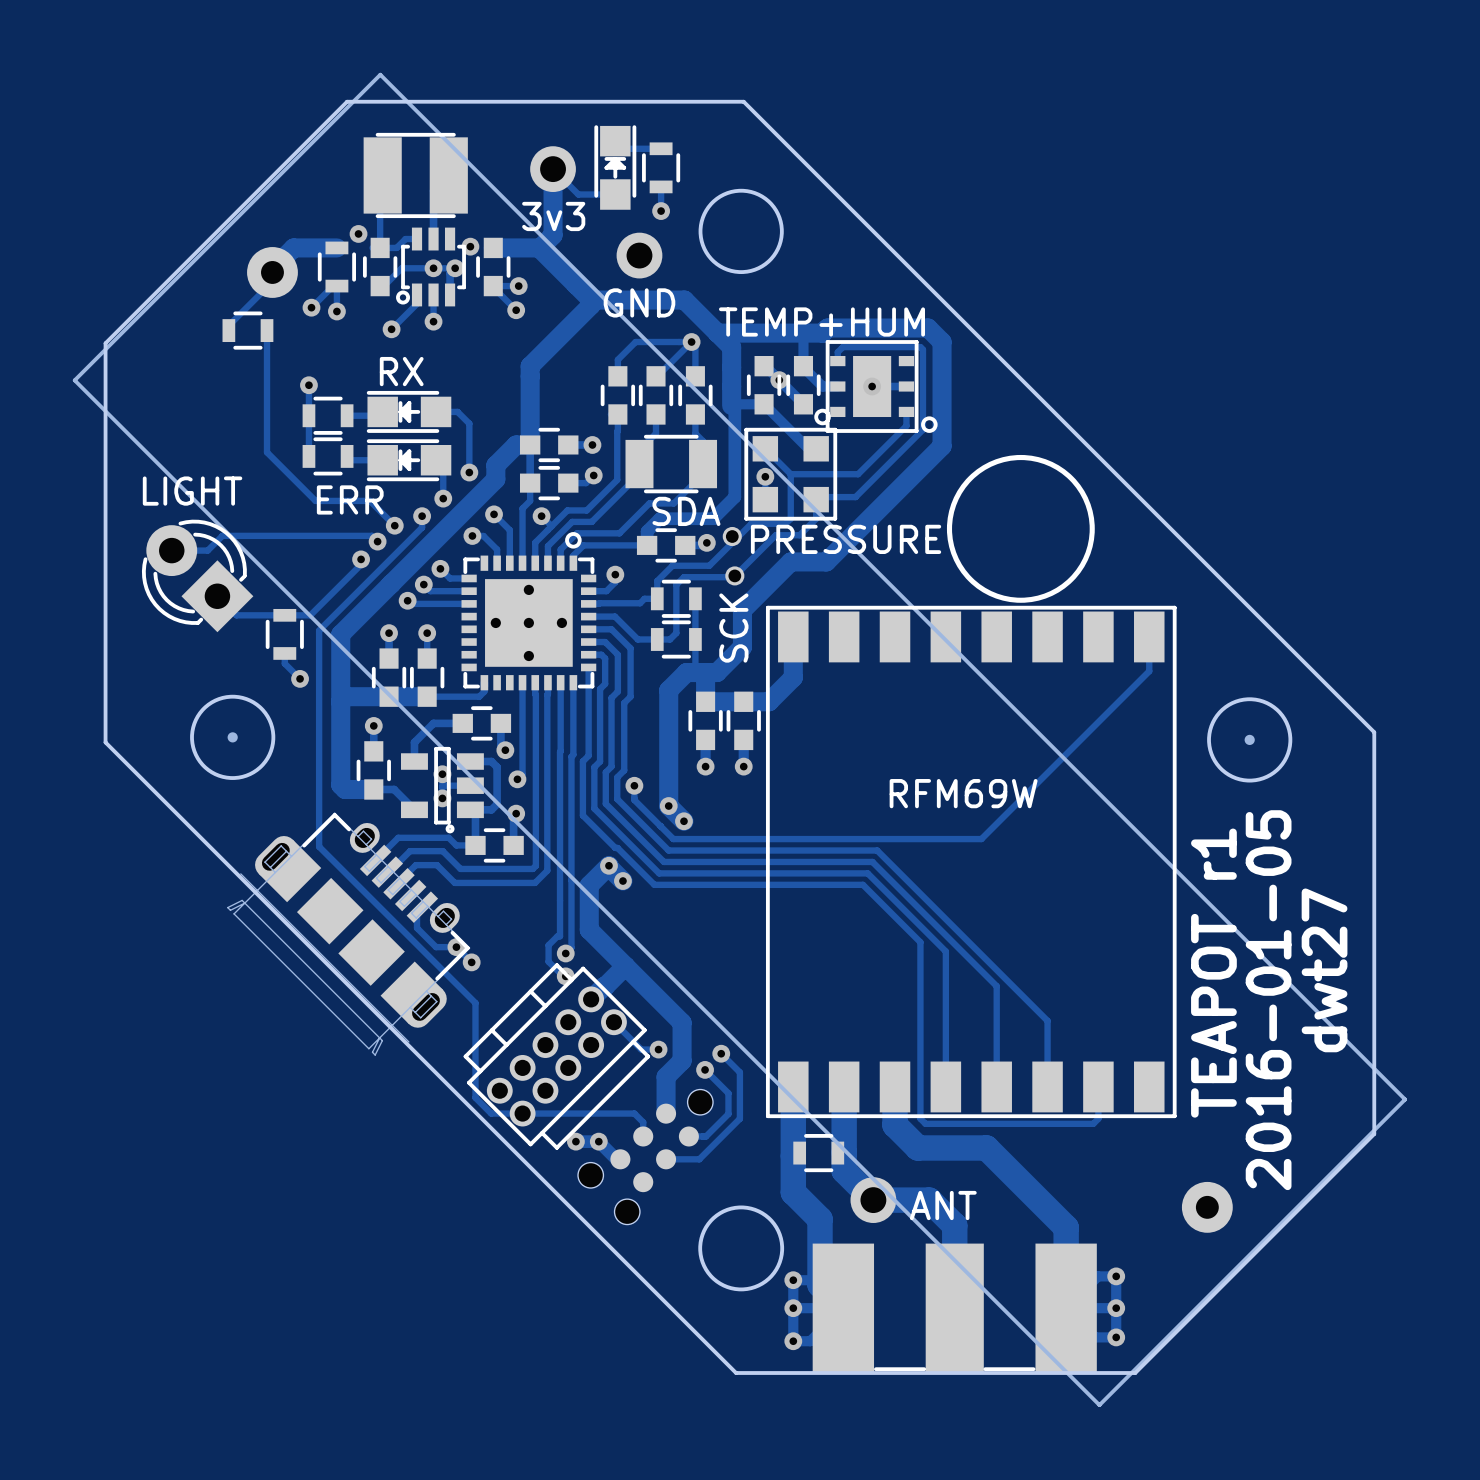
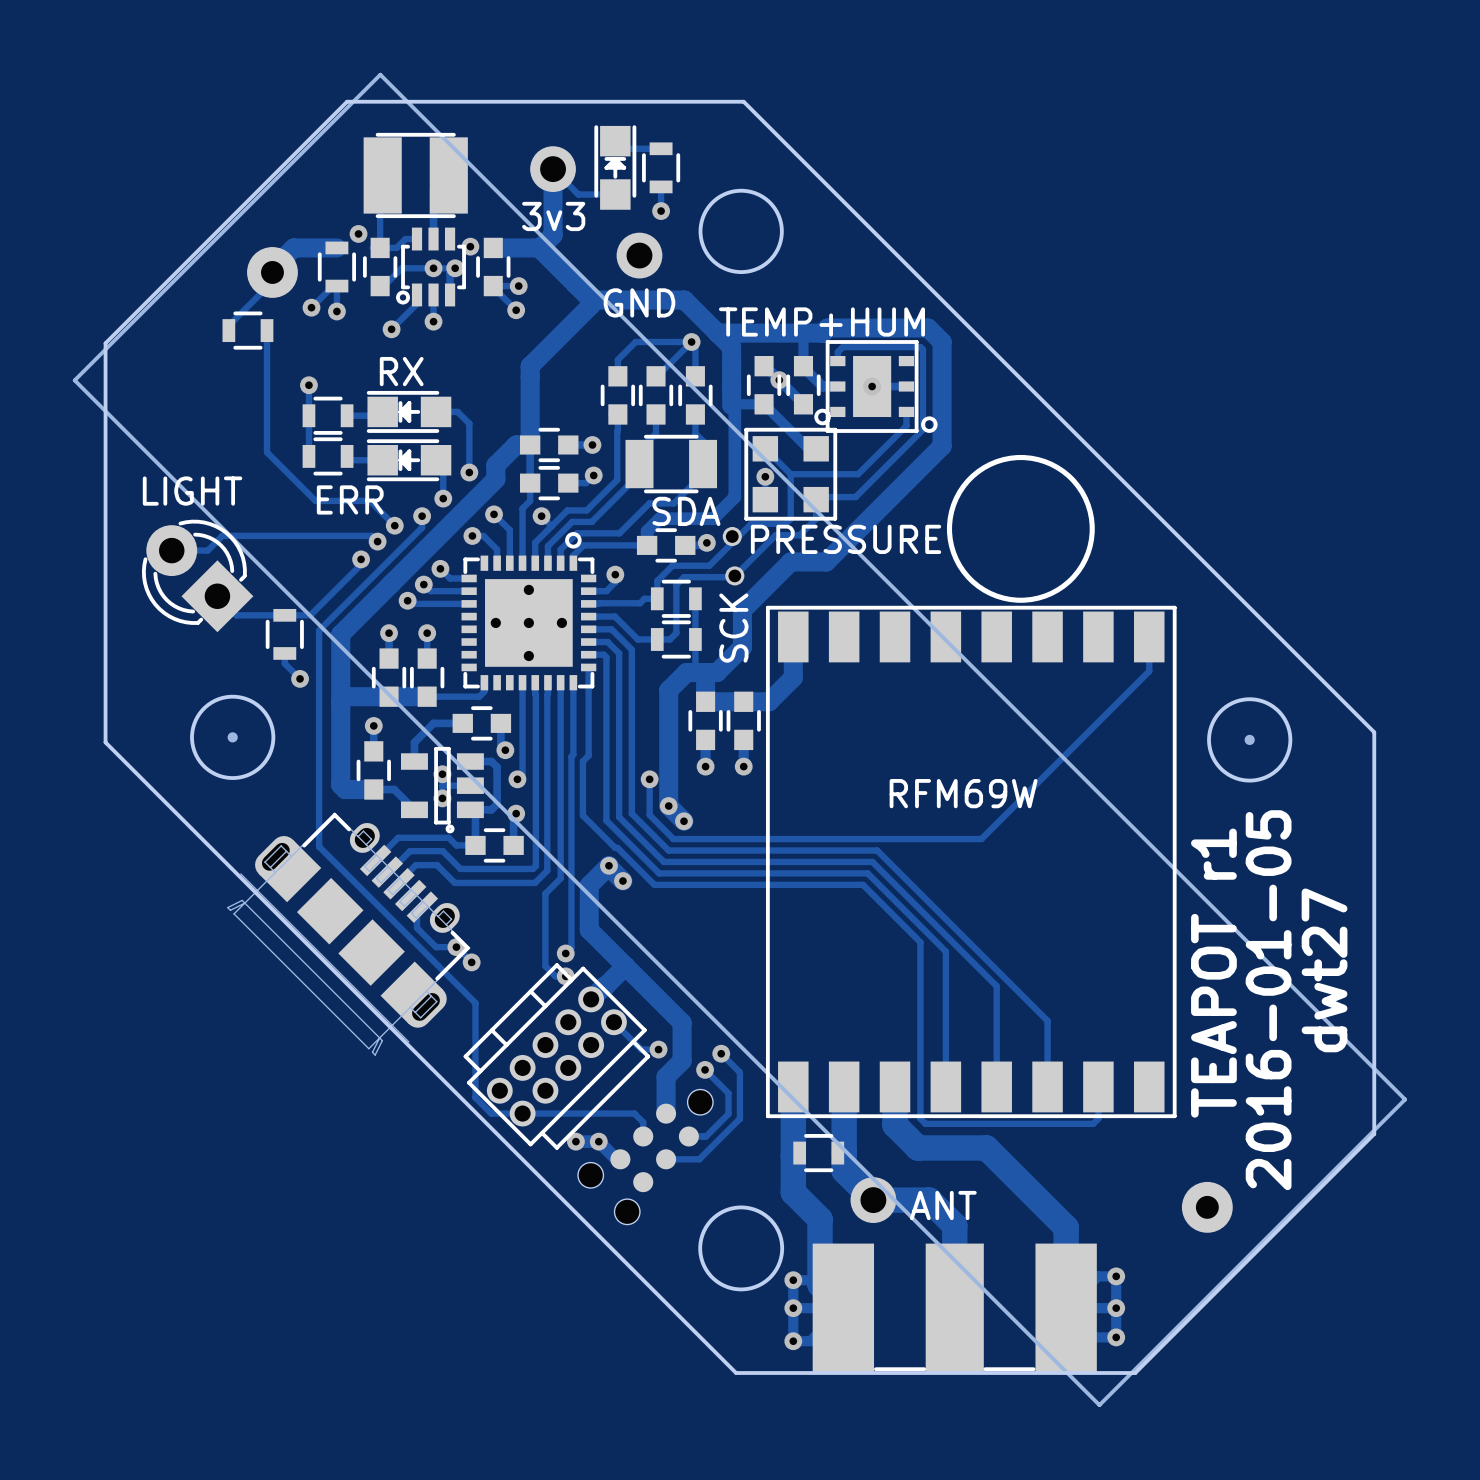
track: (605, 642) (617, 654) (617, 691) (611, 697) (611, 766) (605, 772) (605, 803) (619, 817) -> (605, 642) (607, 642) (619, 653) (619, 817)
track: (630, 648) (630, 696) (624, 703) (624, 770) (617, 777) (617, 799) (631, 813) -> (630, 648) (631, 813)
track: (601, 654) (605, 658) (605, 683) (600, 689) (600, 761) (594, 767) (594, 808) (606, 820) -> (601, 654) (606, 657) (606, 820)
track: (560, 751) (560, 936) (557, 936) (548, 945) (548, 961) (563, 976) -> (560, 751) (560, 878) (545, 893) (545, 966) (555, 976) (563, 976)
track: (634, 785) (634, 800) (673, 839) -> (649, 779) (649, 815) (673, 839)
via position: (634, 785) -> (649, 779)

